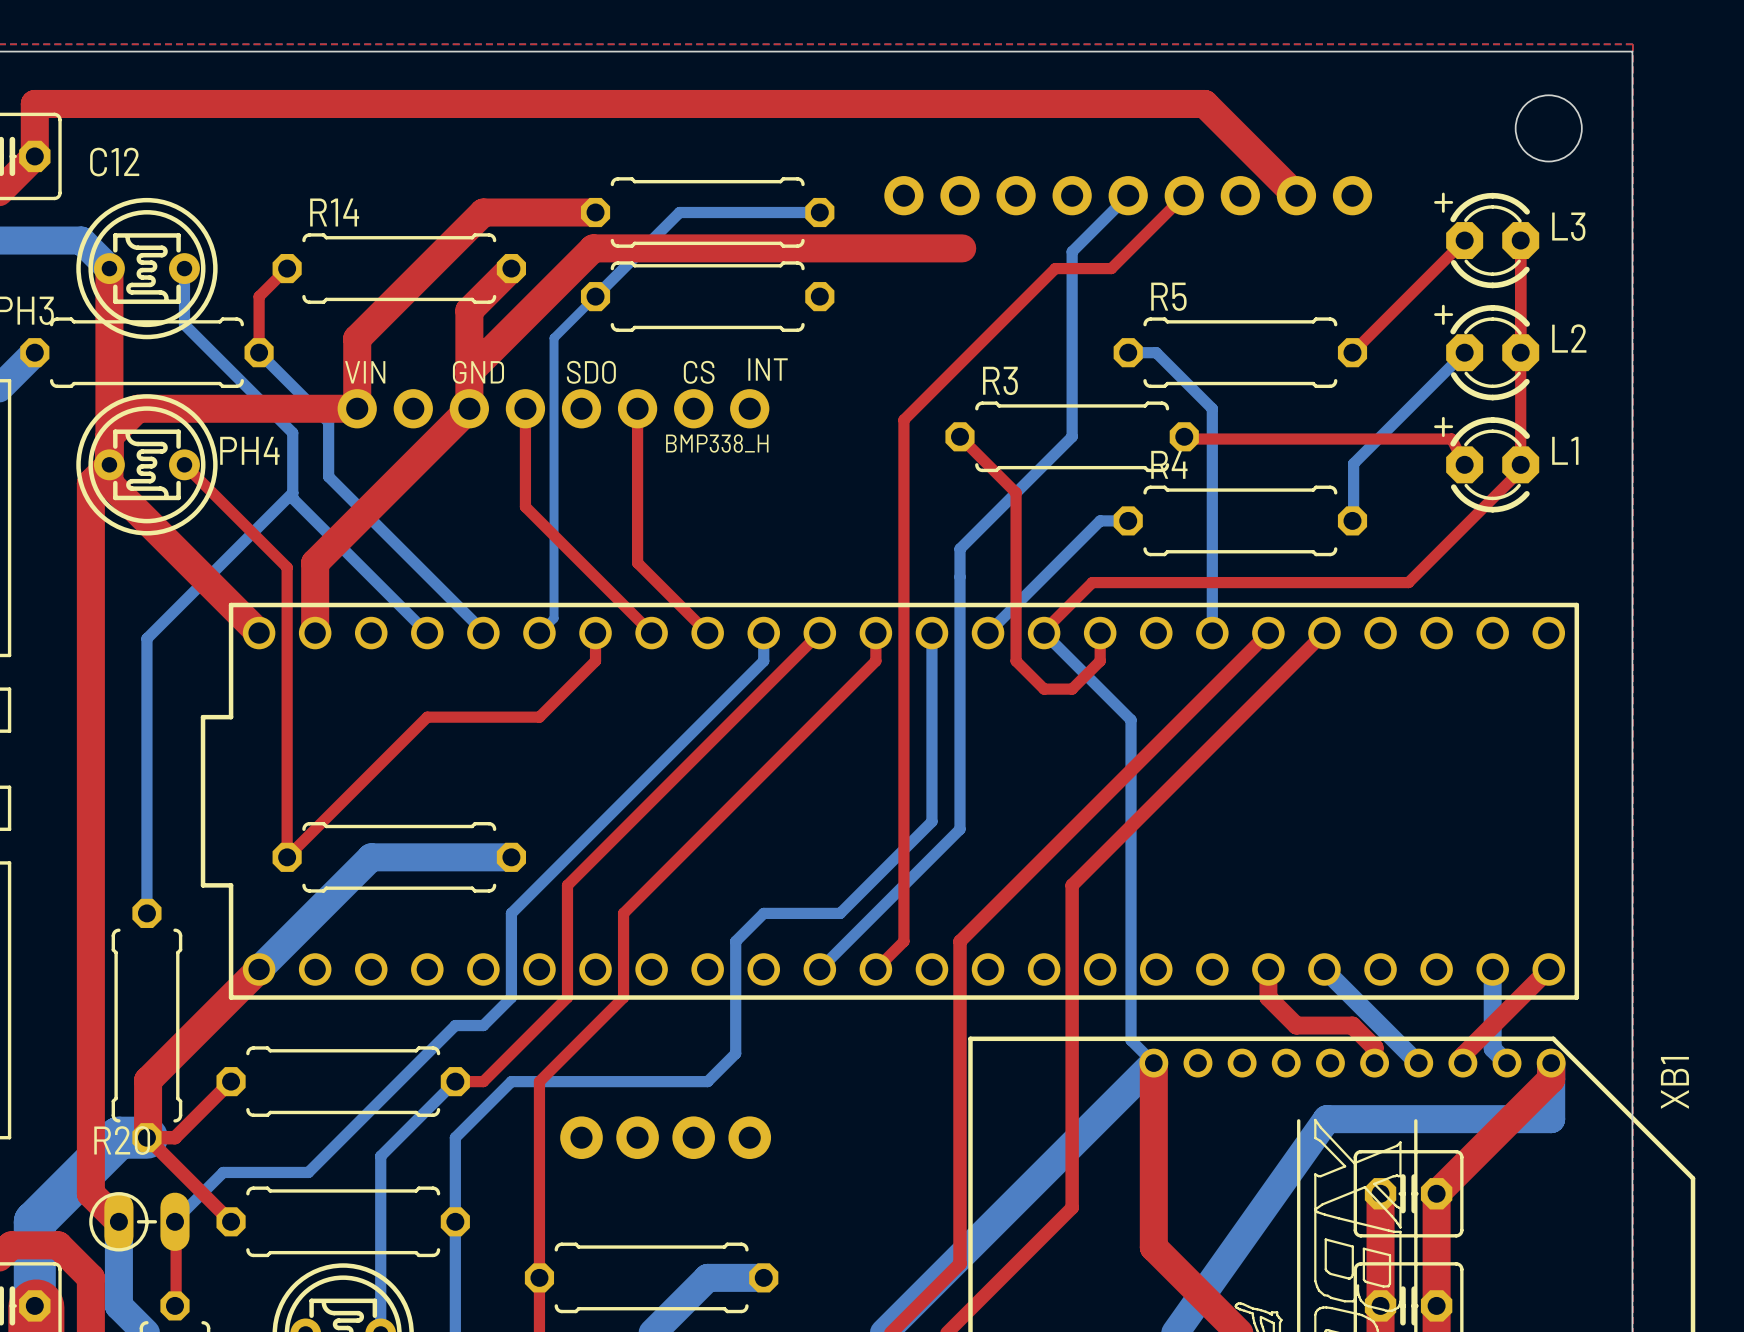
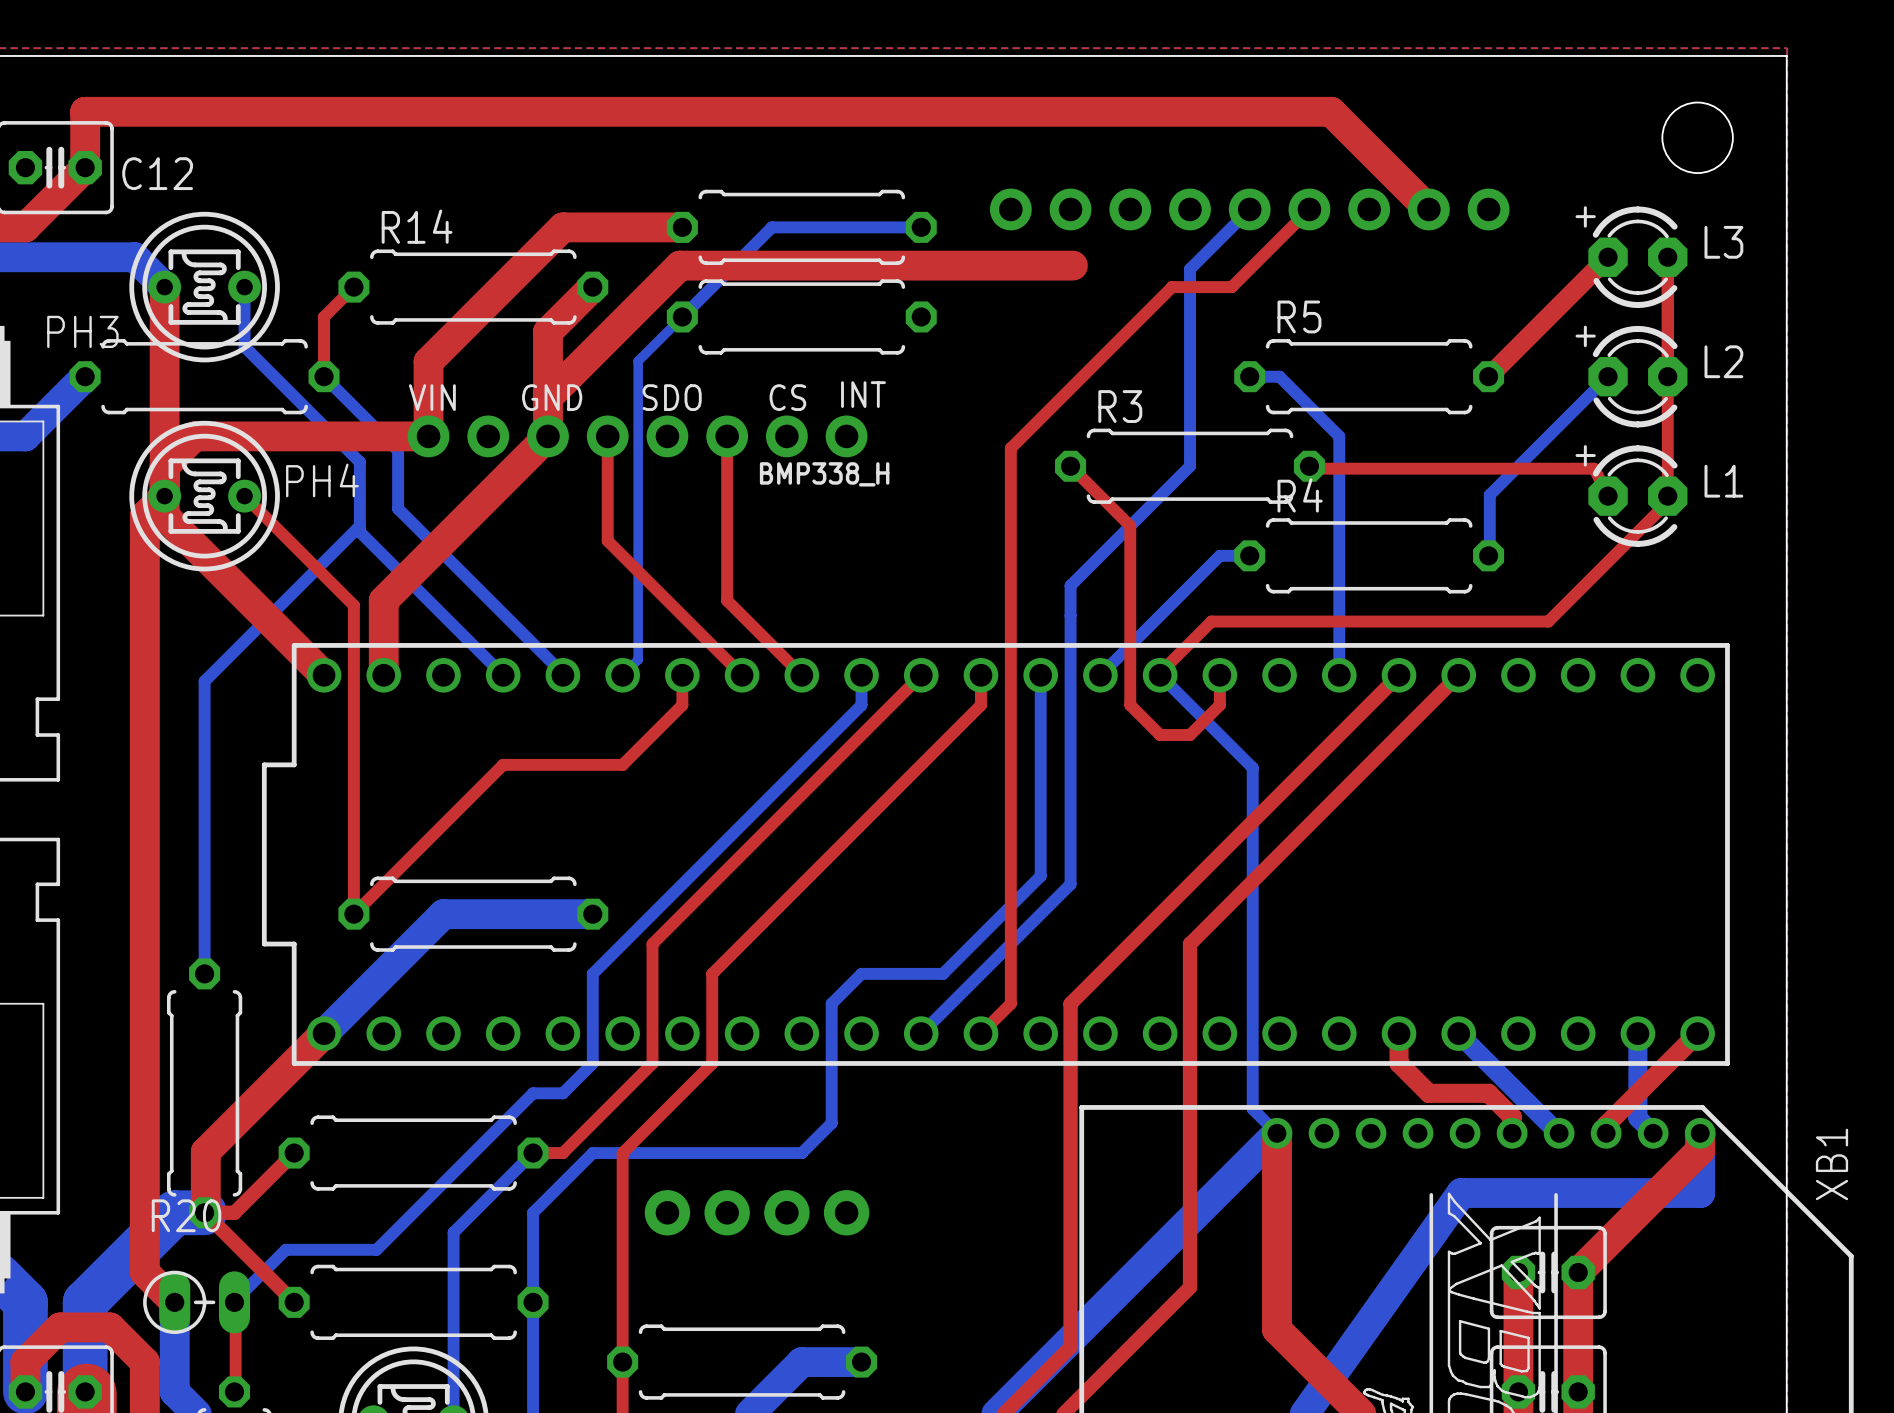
top track width: thin (1464, 240) (1352, 352) -> thick (1608, 257) (1488, 376)

